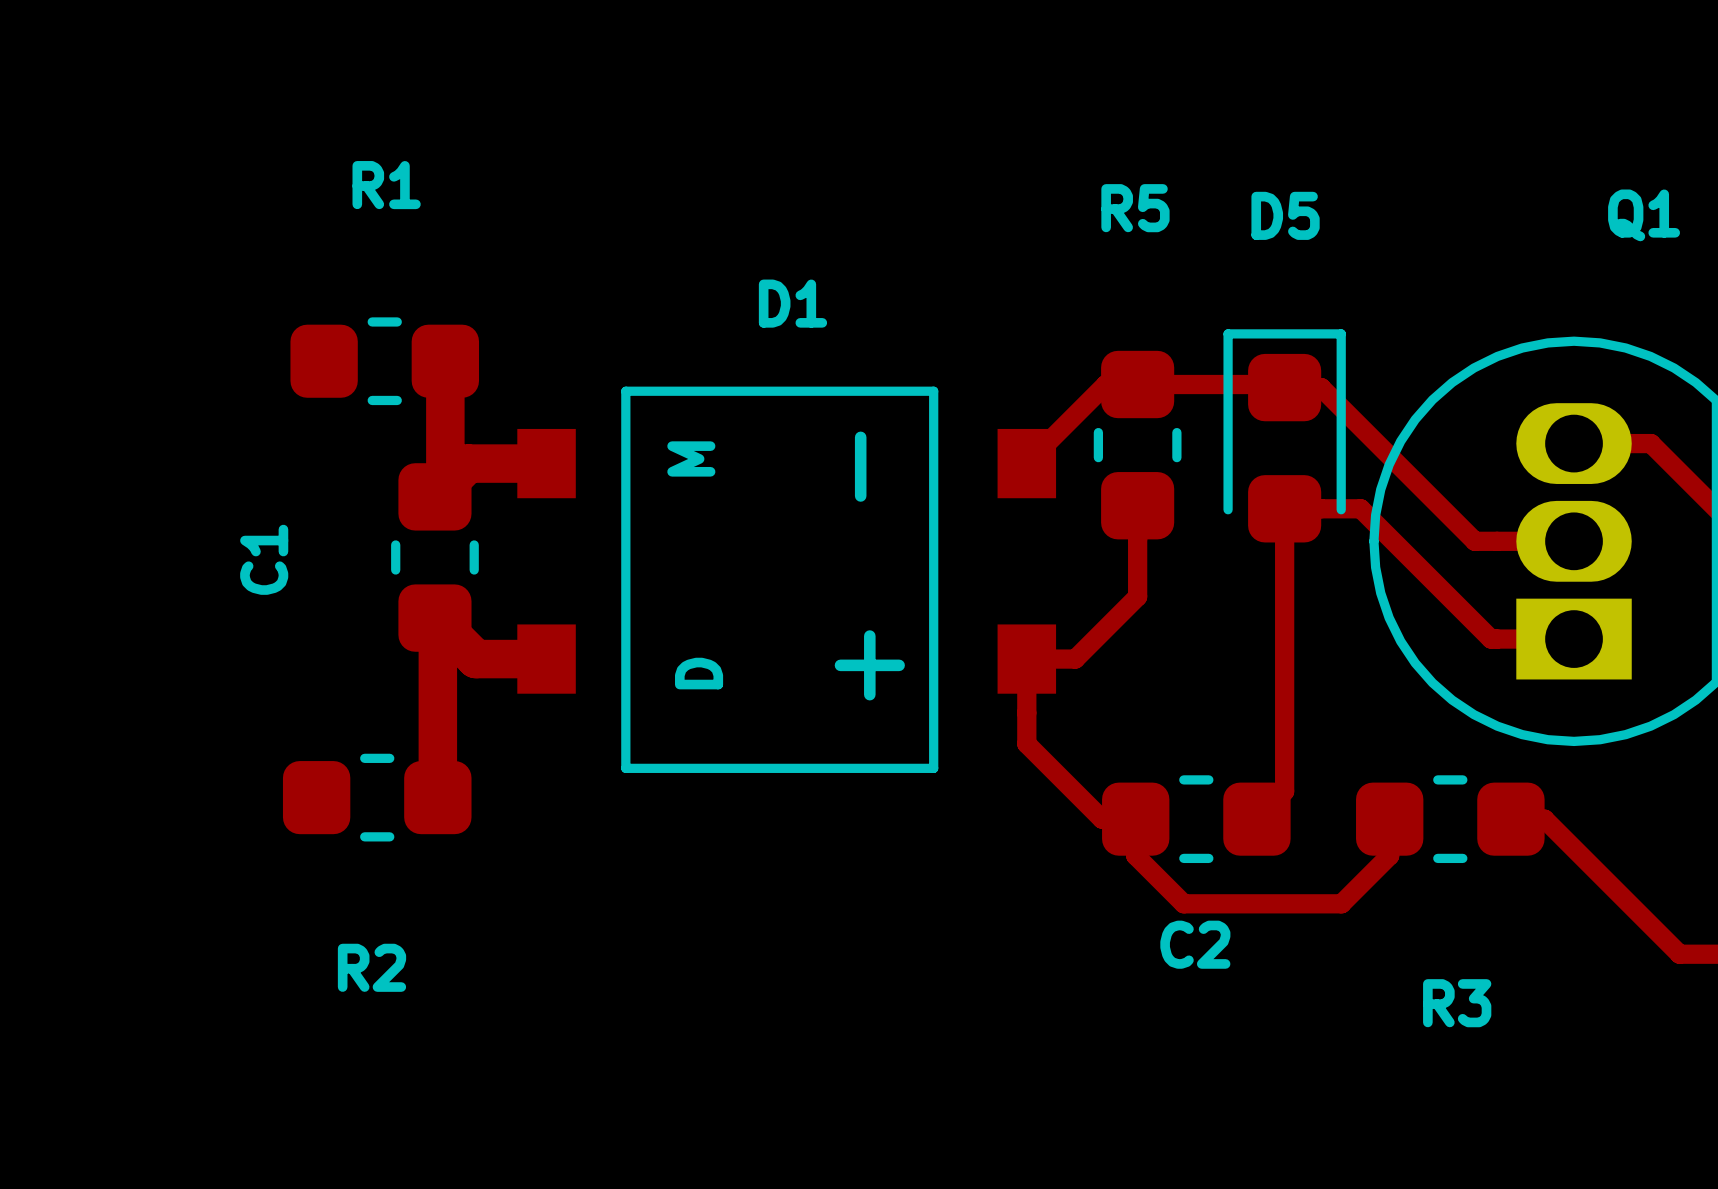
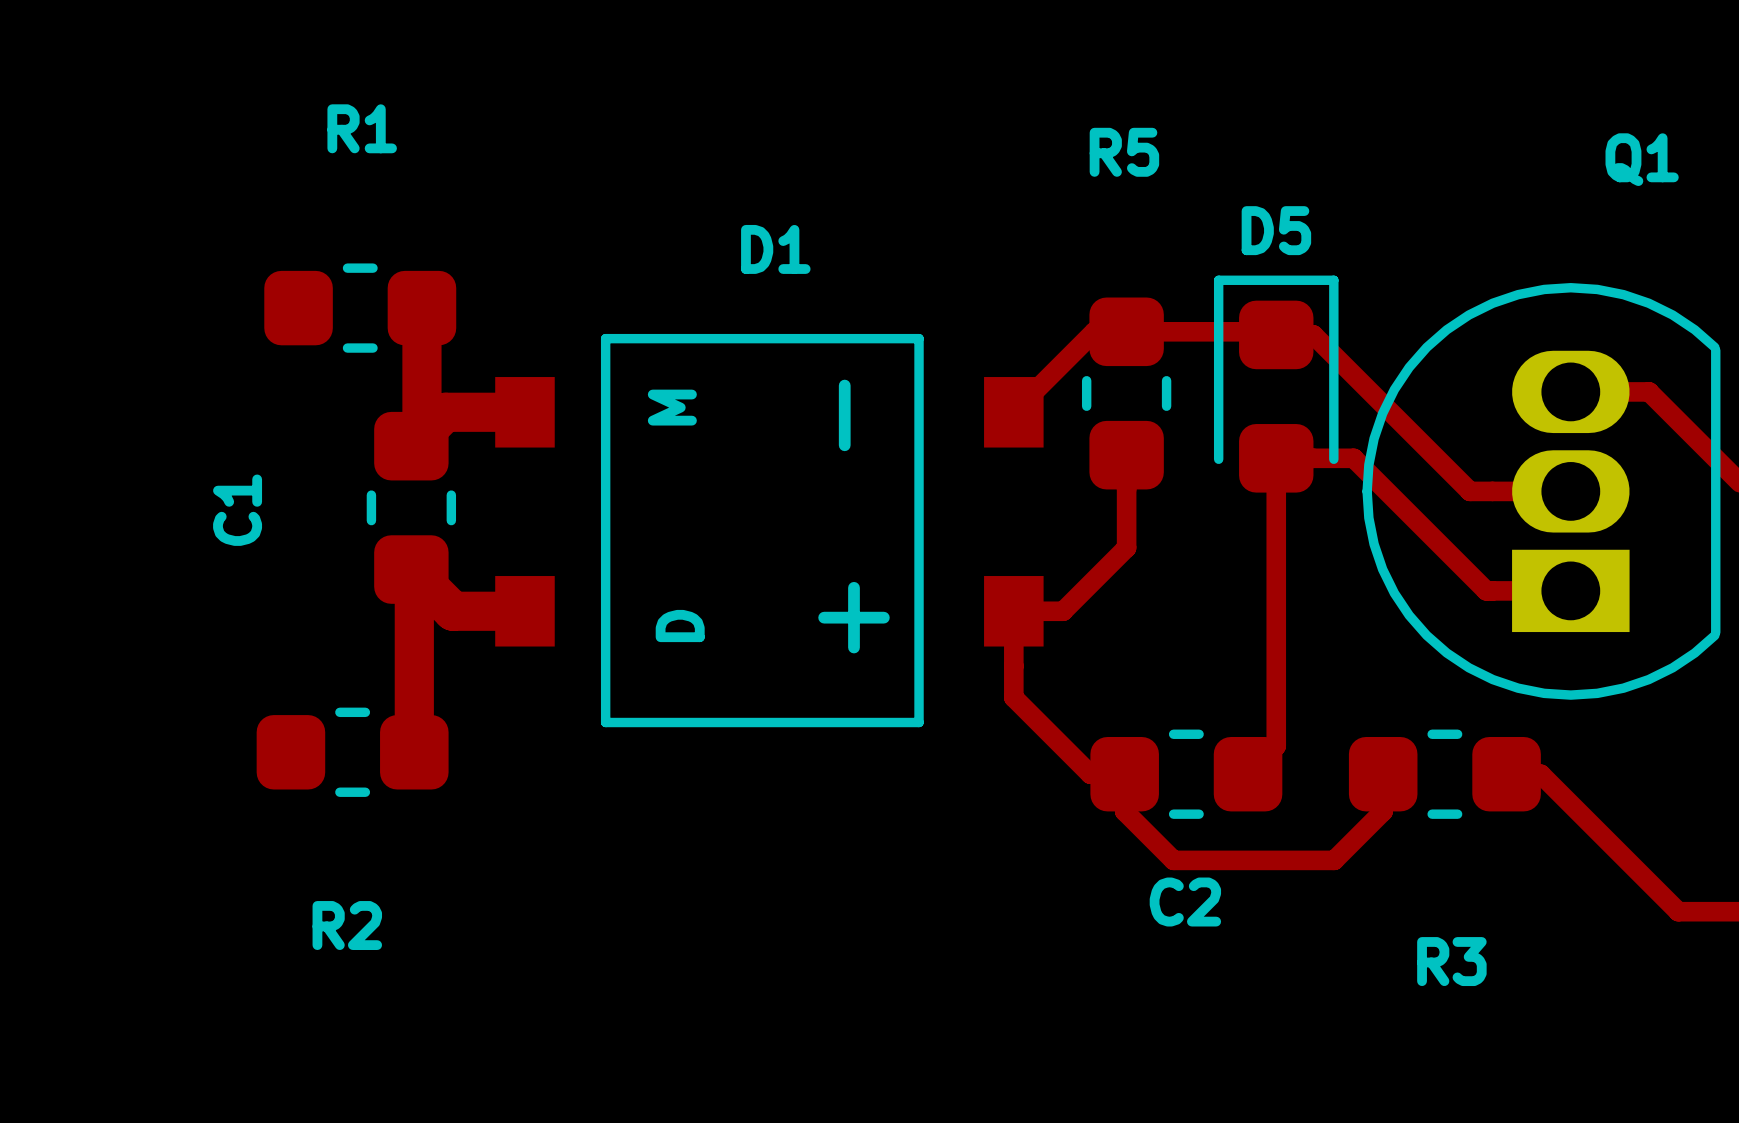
D5 name position: D5 (1285, 215) -> D5 (1276, 230)

